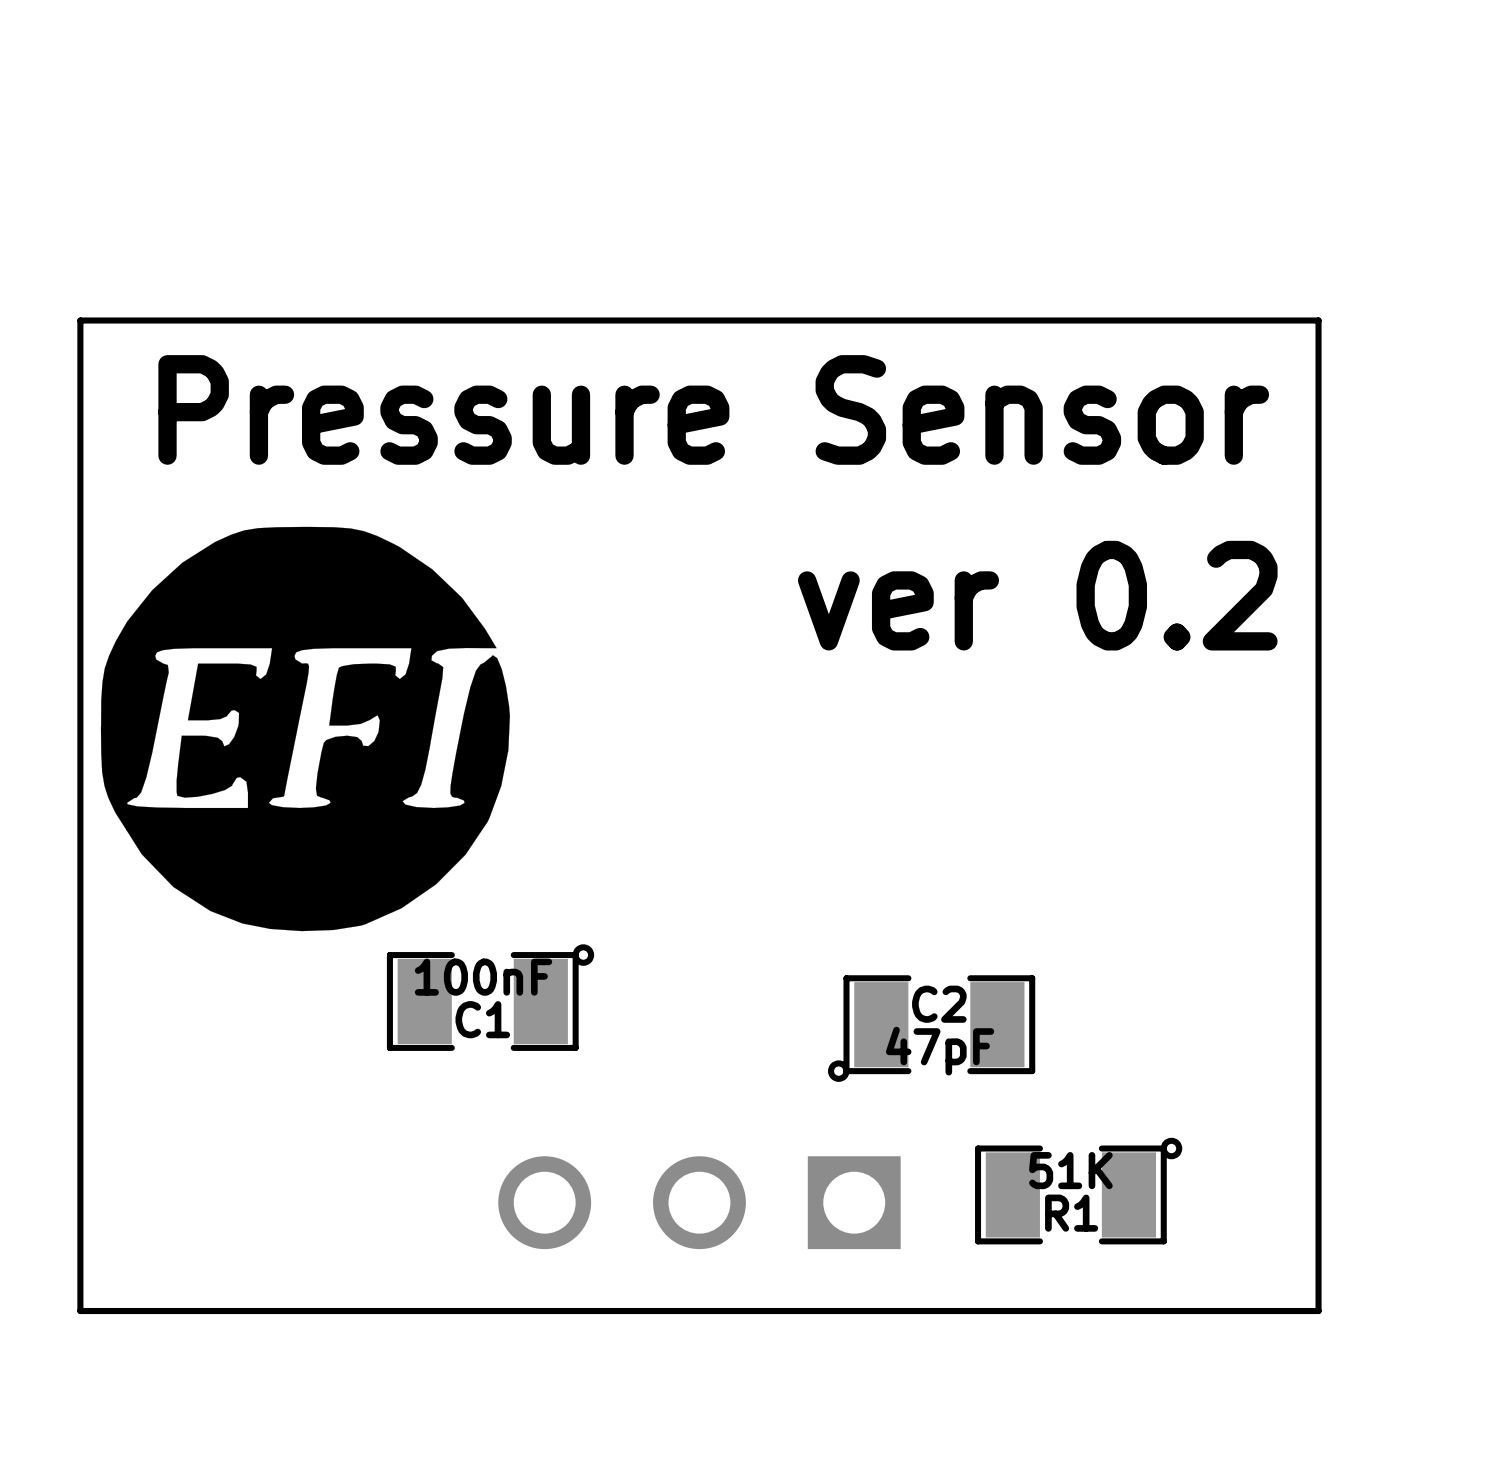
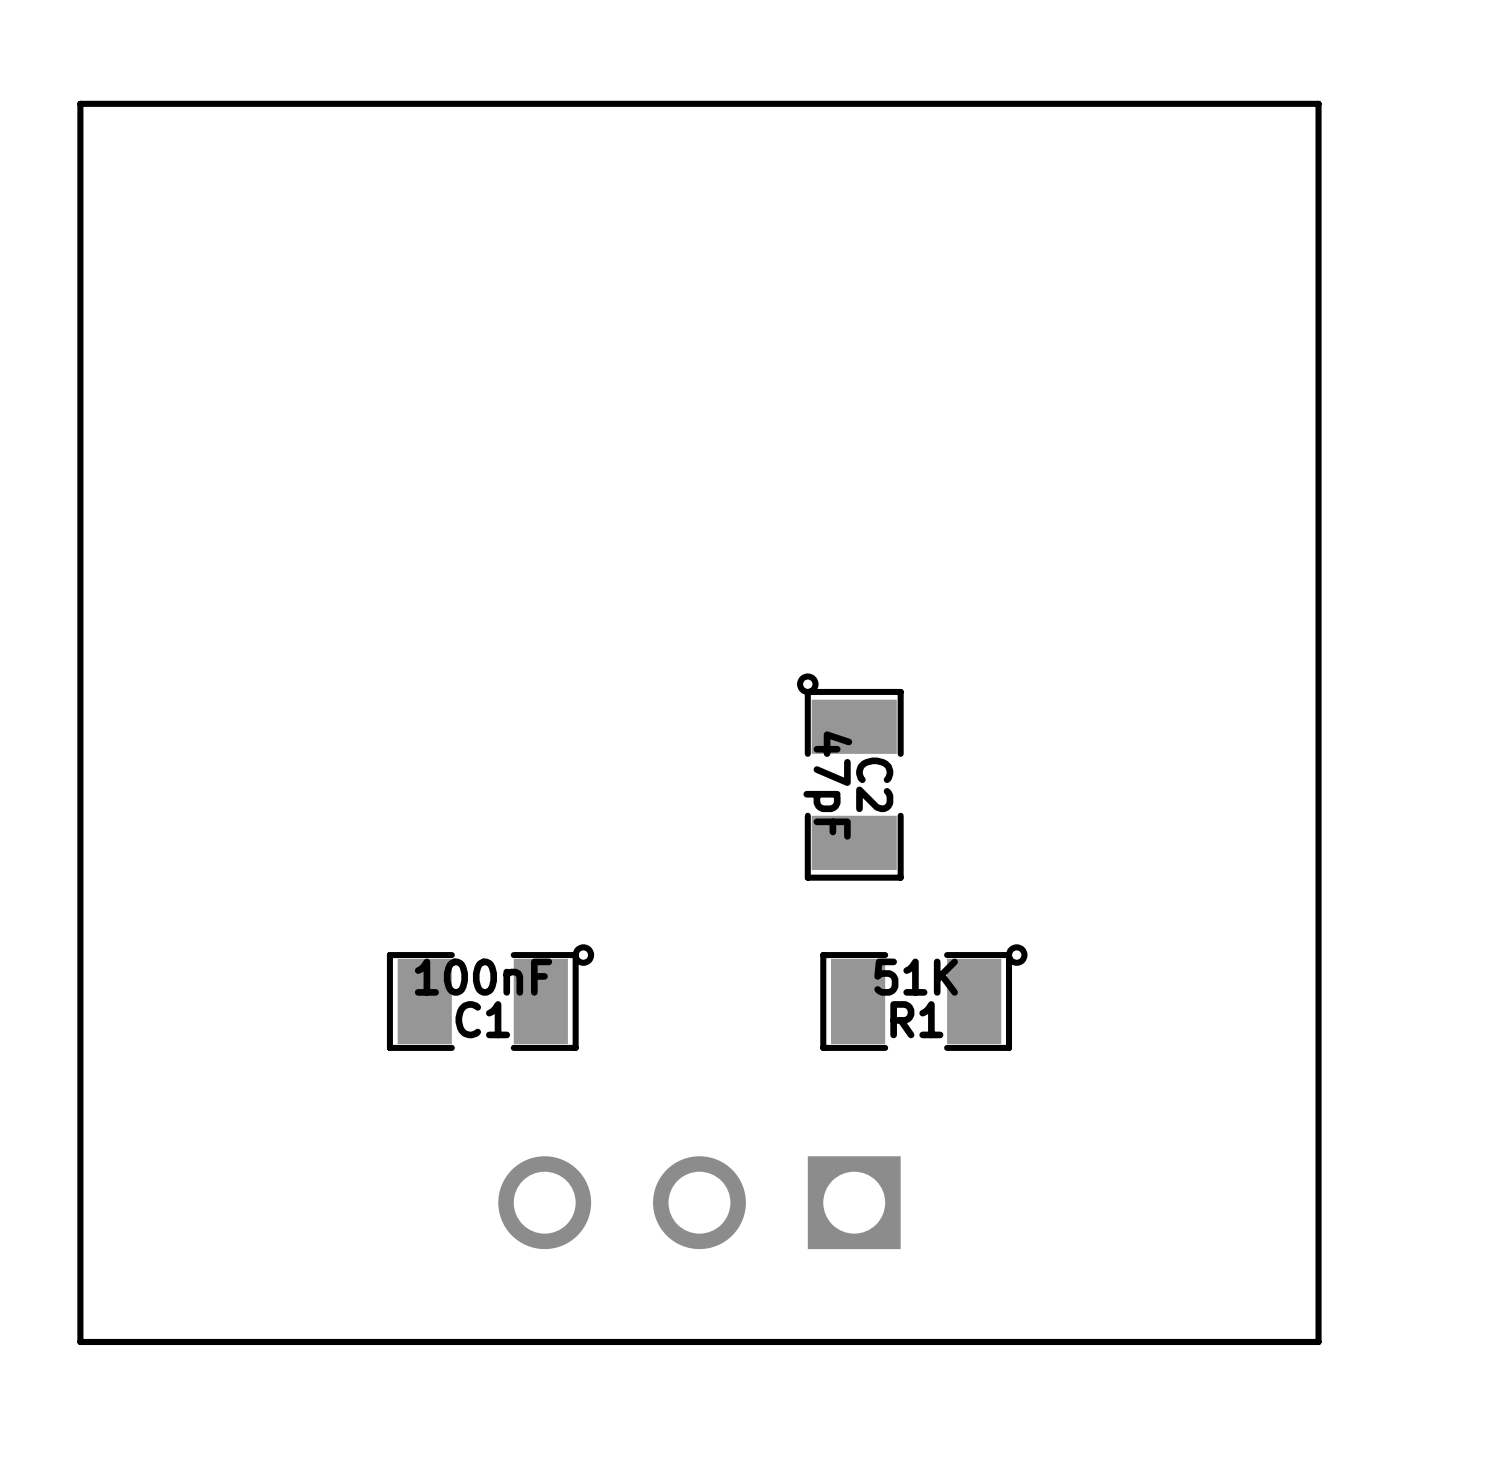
board edge: (1318, 320) (80, 320) -> (1318, 320) (1318, 103) (80, 103) (80, 320)
text: Pressure Sensor (713, 409) -> none
drawing: [100, 526, 510, 932] -> none
text: ver 0.2 (1037, 595) -> none
C2 rotation: 0° (931, 1028) -> 90° clockwise (850, 777)
C2 position: (931, 1028) -> (850, 777)
R1 position: (1078, 1191) -> (923, 997)
board edge: (1318, 1311) (80, 1311) -> (1318, 1311) (1318, 1341) (80, 1341) (80, 1311)

